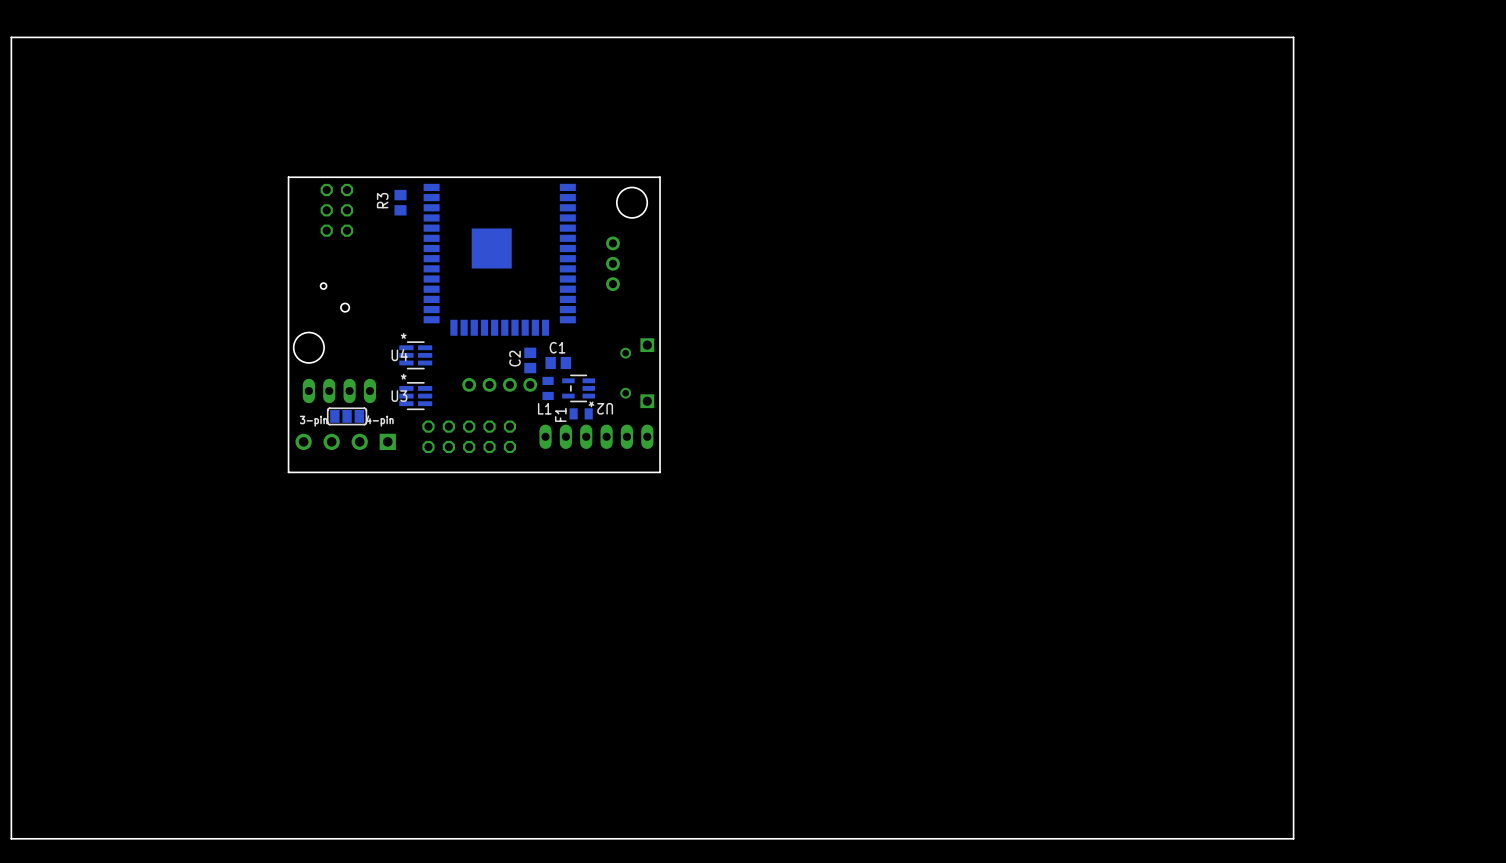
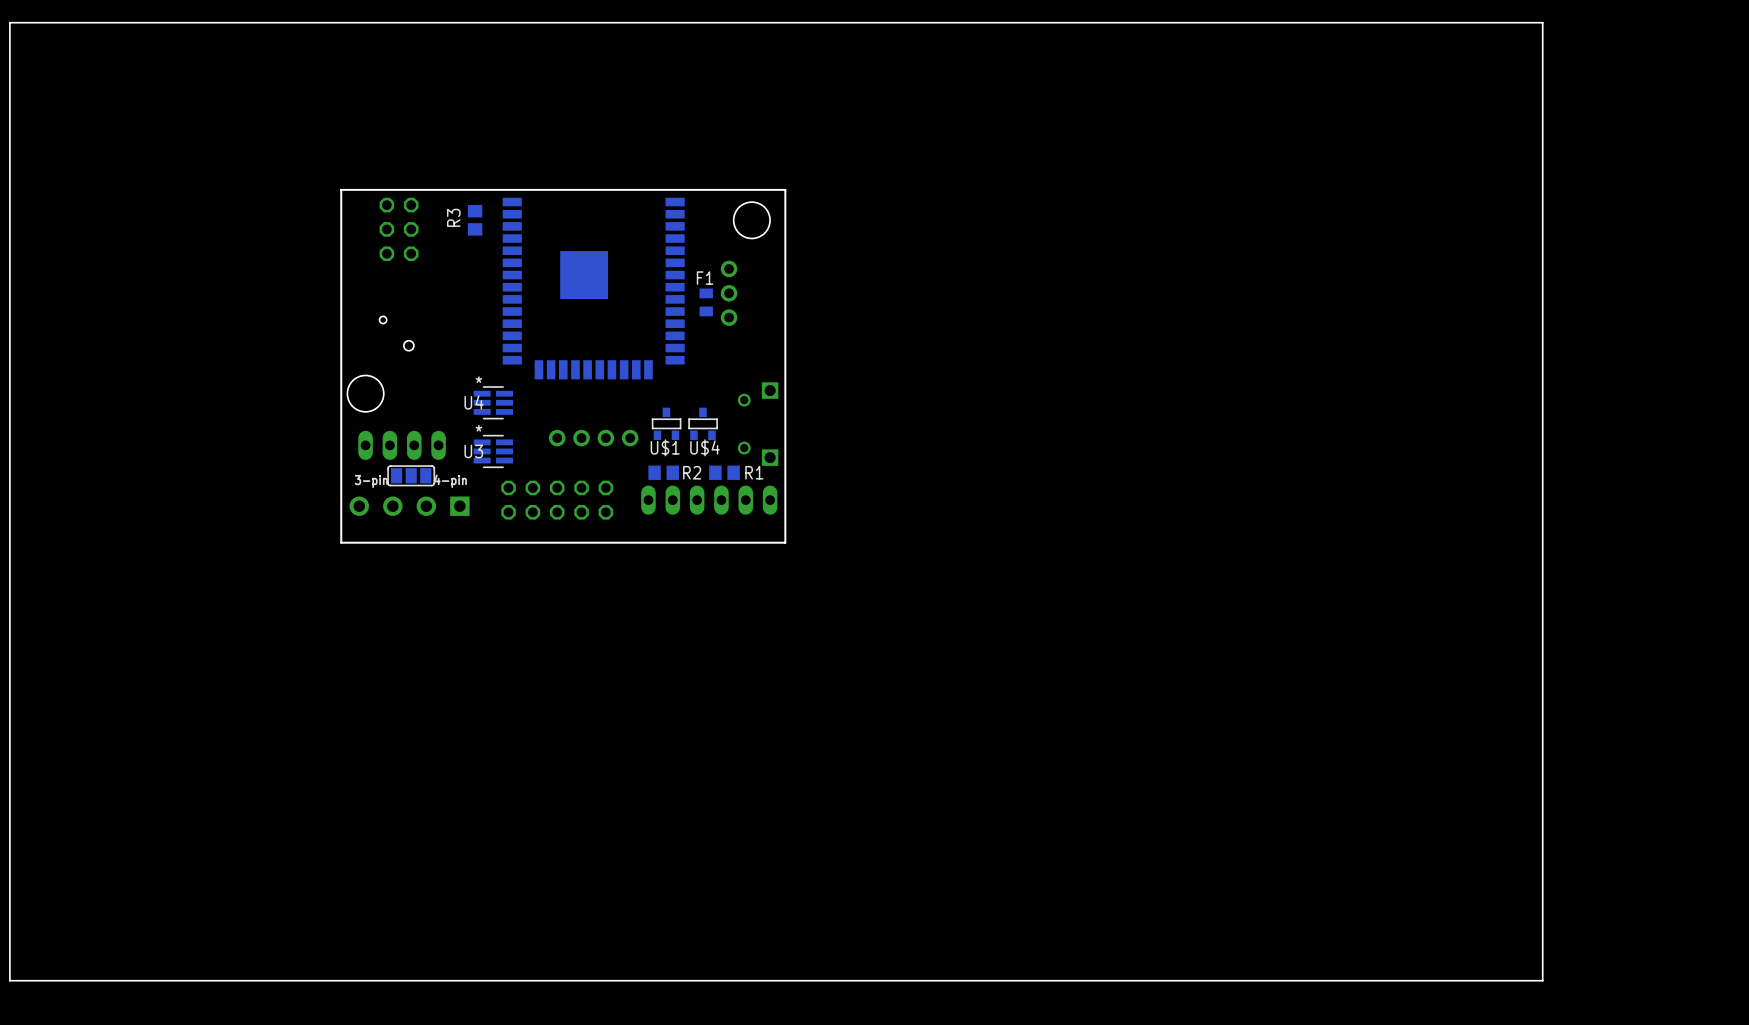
C2: (530, 360) -> none
C1: (558, 362) -> none
U$1: none -> (666, 423)
U$4: none -> (703, 423)
L1: (548, 388) -> none
U2: (578, 388) -> none
R2: none -> (663, 472)
F1 rotation: 0° (581, 413) -> 90° clockwise (706, 302)
F1 position: (581, 413) -> (706, 302)
R1: none -> (724, 472)

